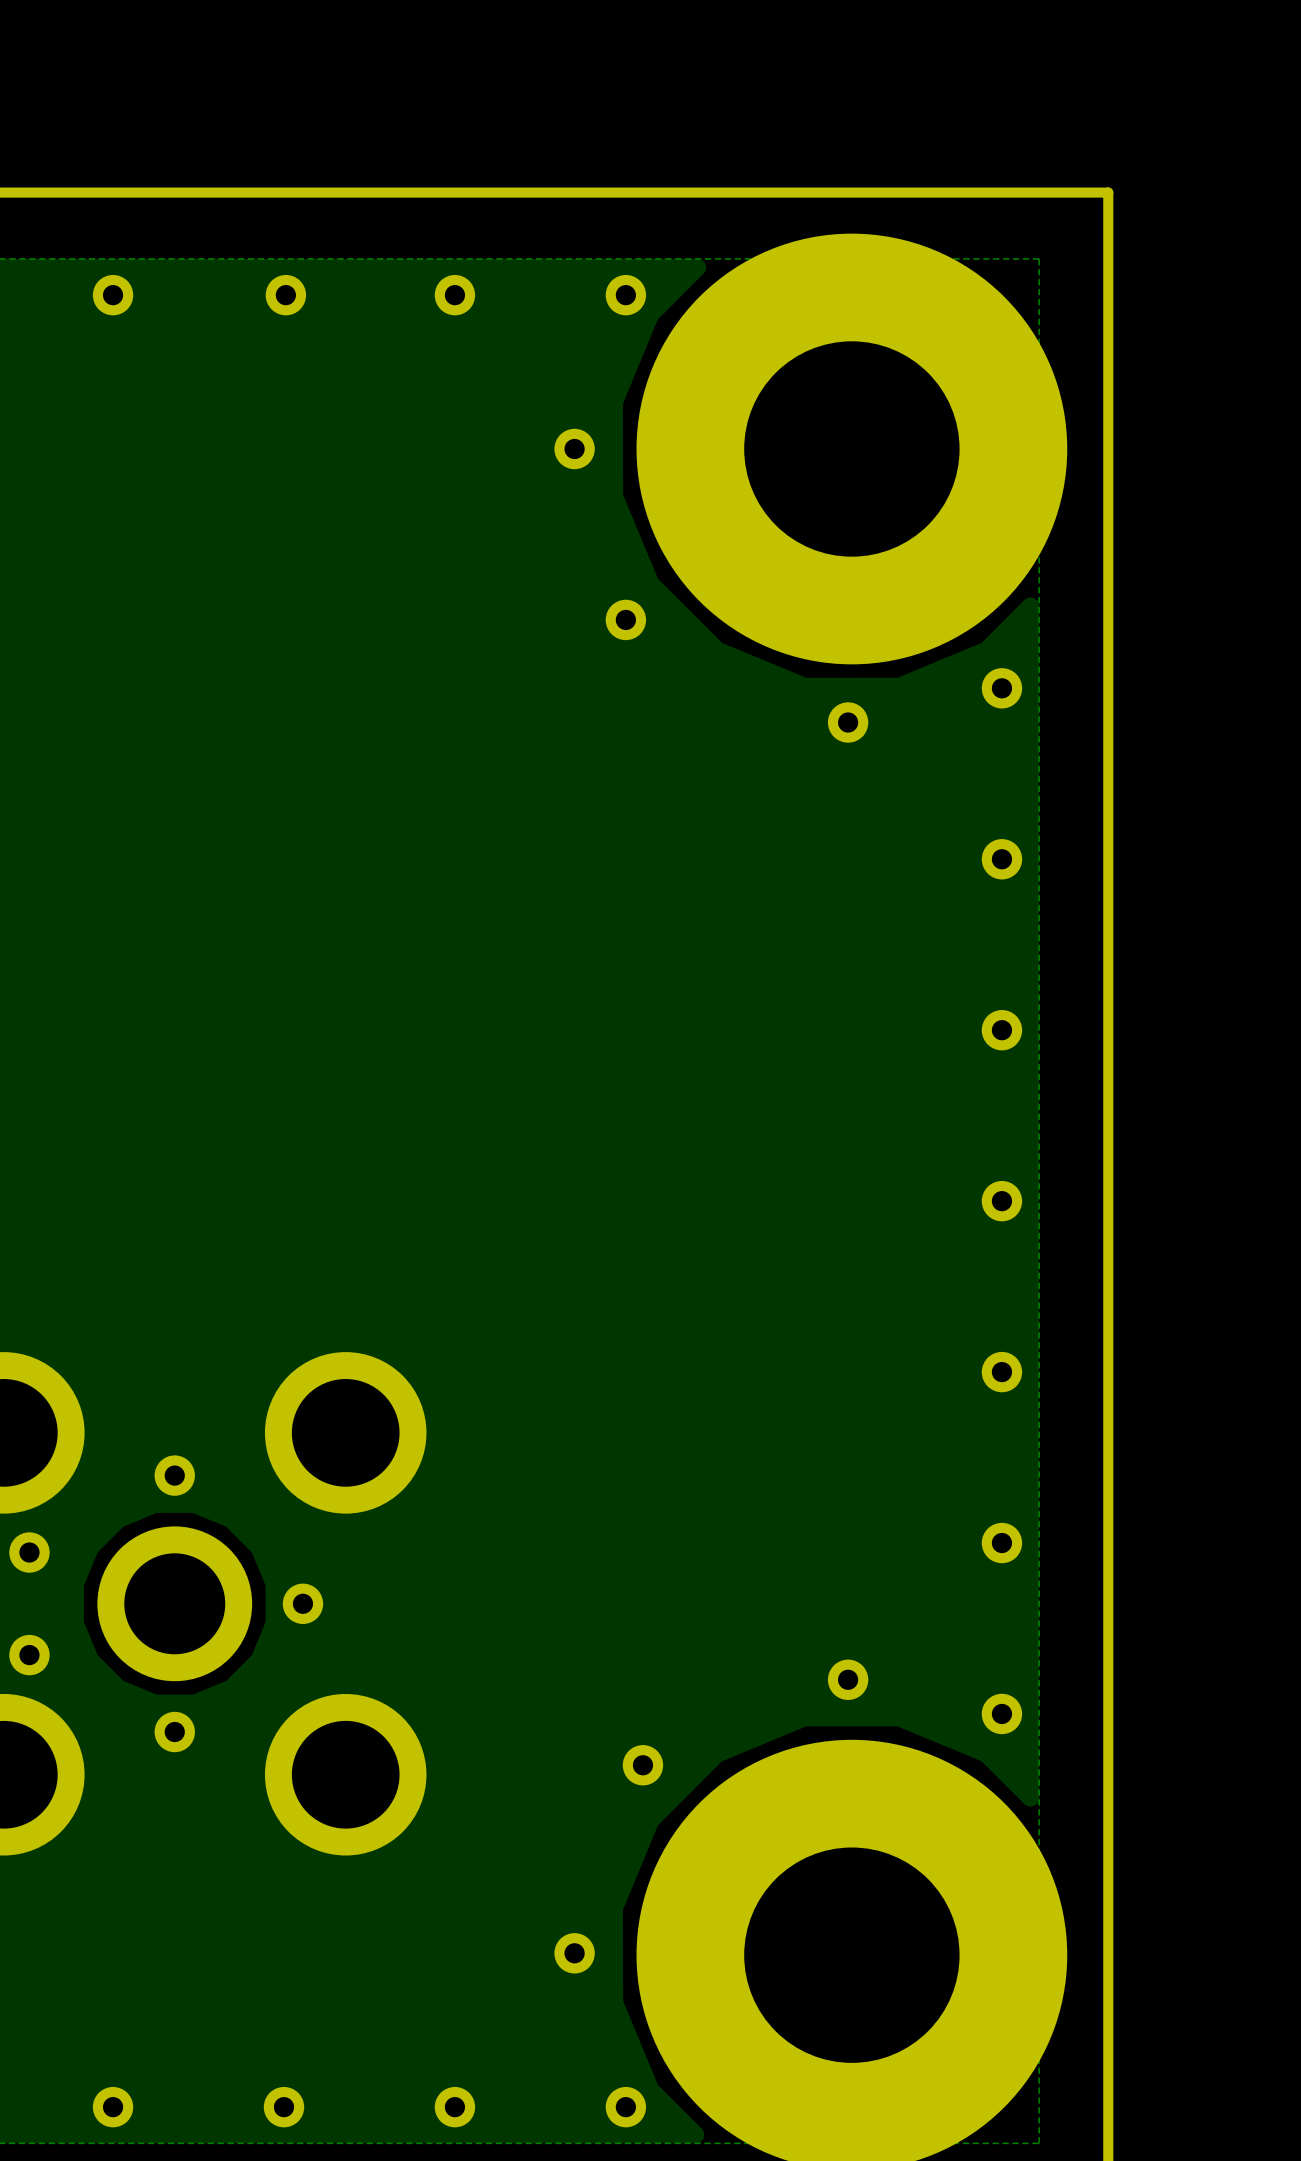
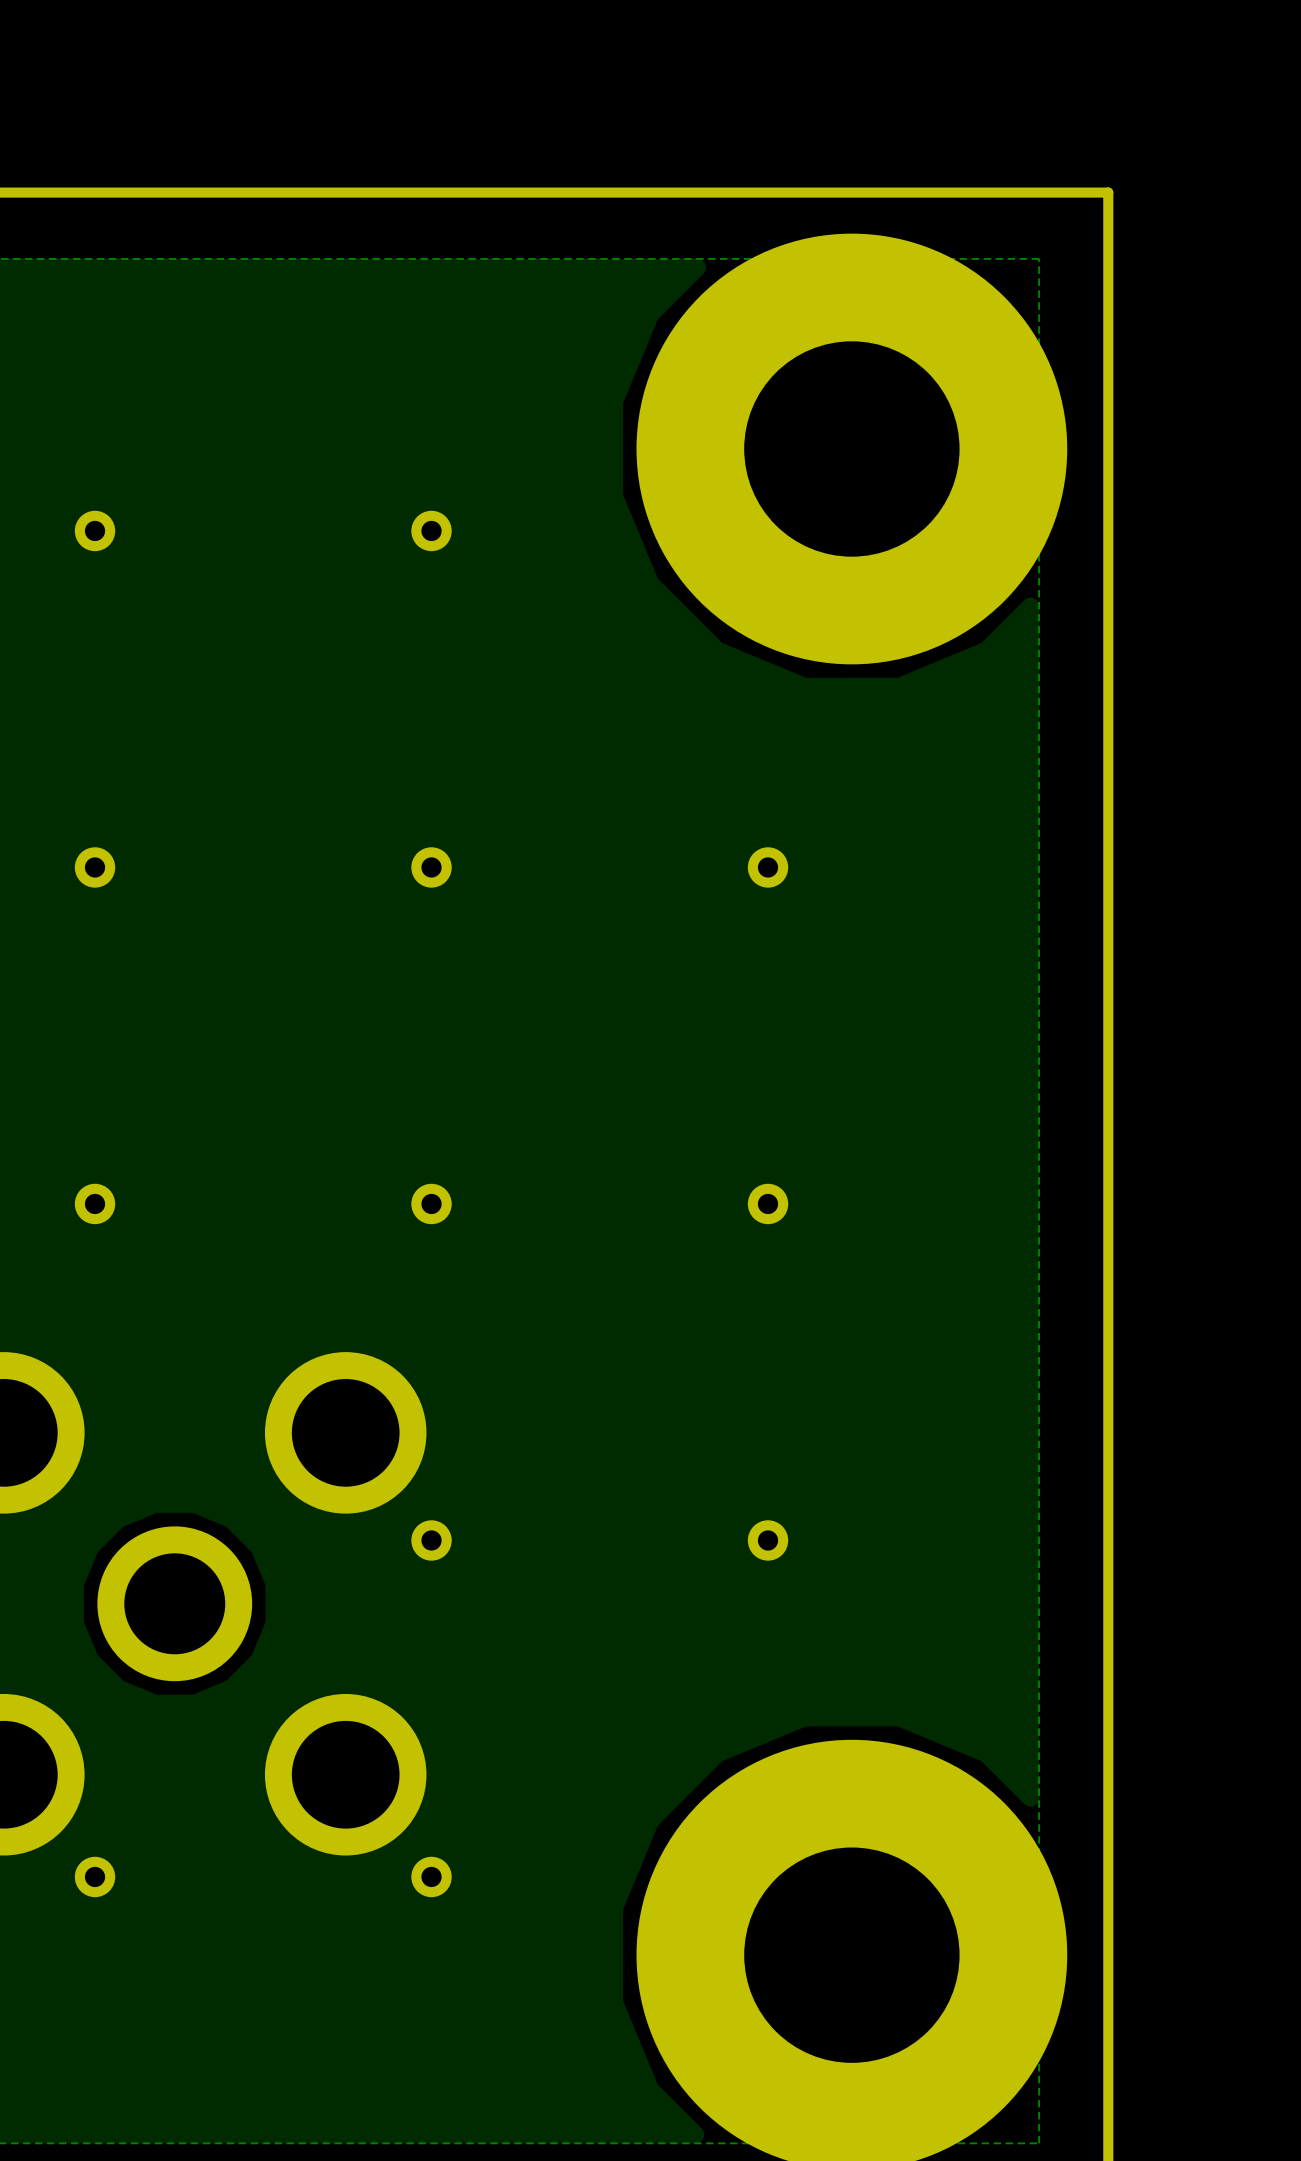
part: (113, 295) -> none
part: (285, 295) -> none
part: (454, 295) -> none
part: (625, 295) -> none
part: (574, 448) -> none
part: none -> (95, 530)
part: none -> (431, 530)
part: (625, 619) -> none
part: (1001, 688) -> none
part: (848, 722) -> none
part: (1001, 859) -> none
part: none -> (95, 867)
part: none -> (431, 867)
part: none -> (768, 867)
part: (1001, 1030) -> none
part: (1001, 1201) -> none
part: none -> (95, 1203)
part: none -> (431, 1203)
part: none -> (768, 1203)
part: (1001, 1372) -> none
part: (174, 1475) -> none
part: none -> (431, 1540)
part: none -> (768, 1540)
part: (1001, 1543) -> none
part: (29, 1552) -> none
part: (302, 1603) -> none
part: (29, 1655) -> none
part: (848, 1679) -> none
part: (1001, 1713) -> none
part: (174, 1732) -> none
part: (642, 1765) -> none
part: none -> (95, 1876)
part: none -> (431, 1876)
part: (574, 1953) -> none
part: (113, 2107) -> none
part: (283, 2107) -> none
part: (454, 2107) -> none
part: (625, 2107) -> none

